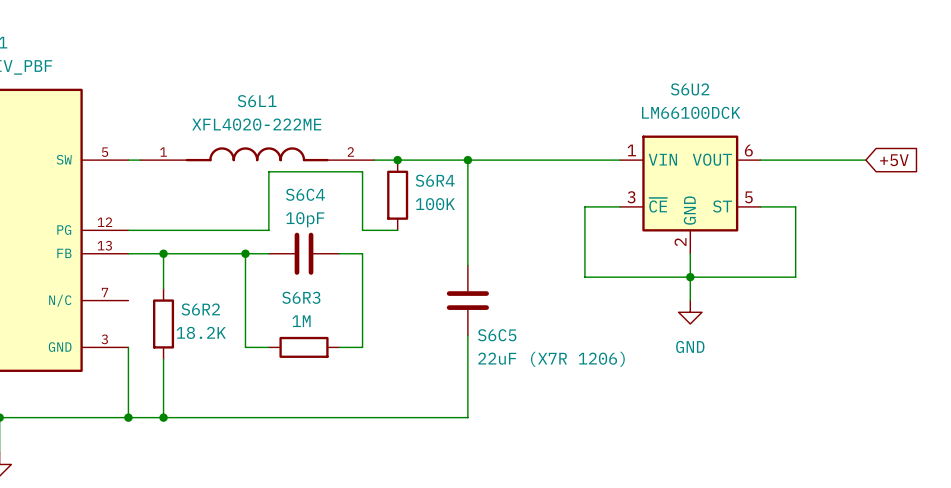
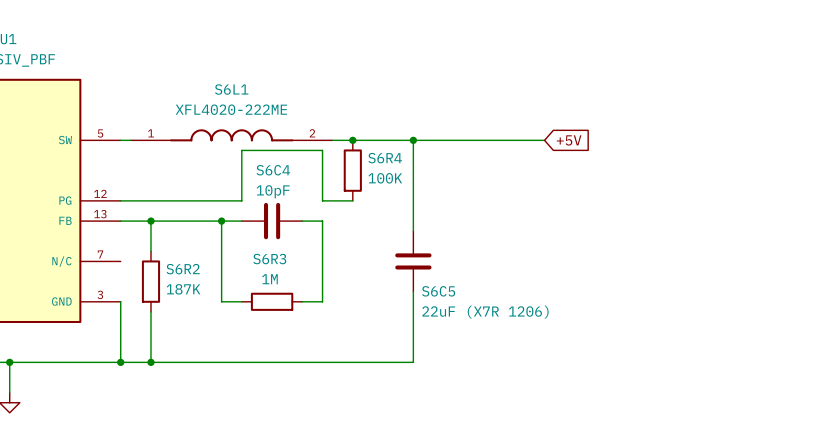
global label: none -> +5V (569, 140)
wire: (760, 160) (865, 160) -> none
global label: +5V (894, 160) -> none
S6U2: LM66100DCK (690, 194) -> none
wire: (620, 206) (584, 206) (584, 277) (795, 277) (795, 206) (760, 206) -> none
wire: (690, 253) (690, 300) -> none
junction: (690, 277) -> none
power symbol: GND (690, 312) -> none
S6R2 value: 18.2K (201, 332) -> 187K (183, 289)

